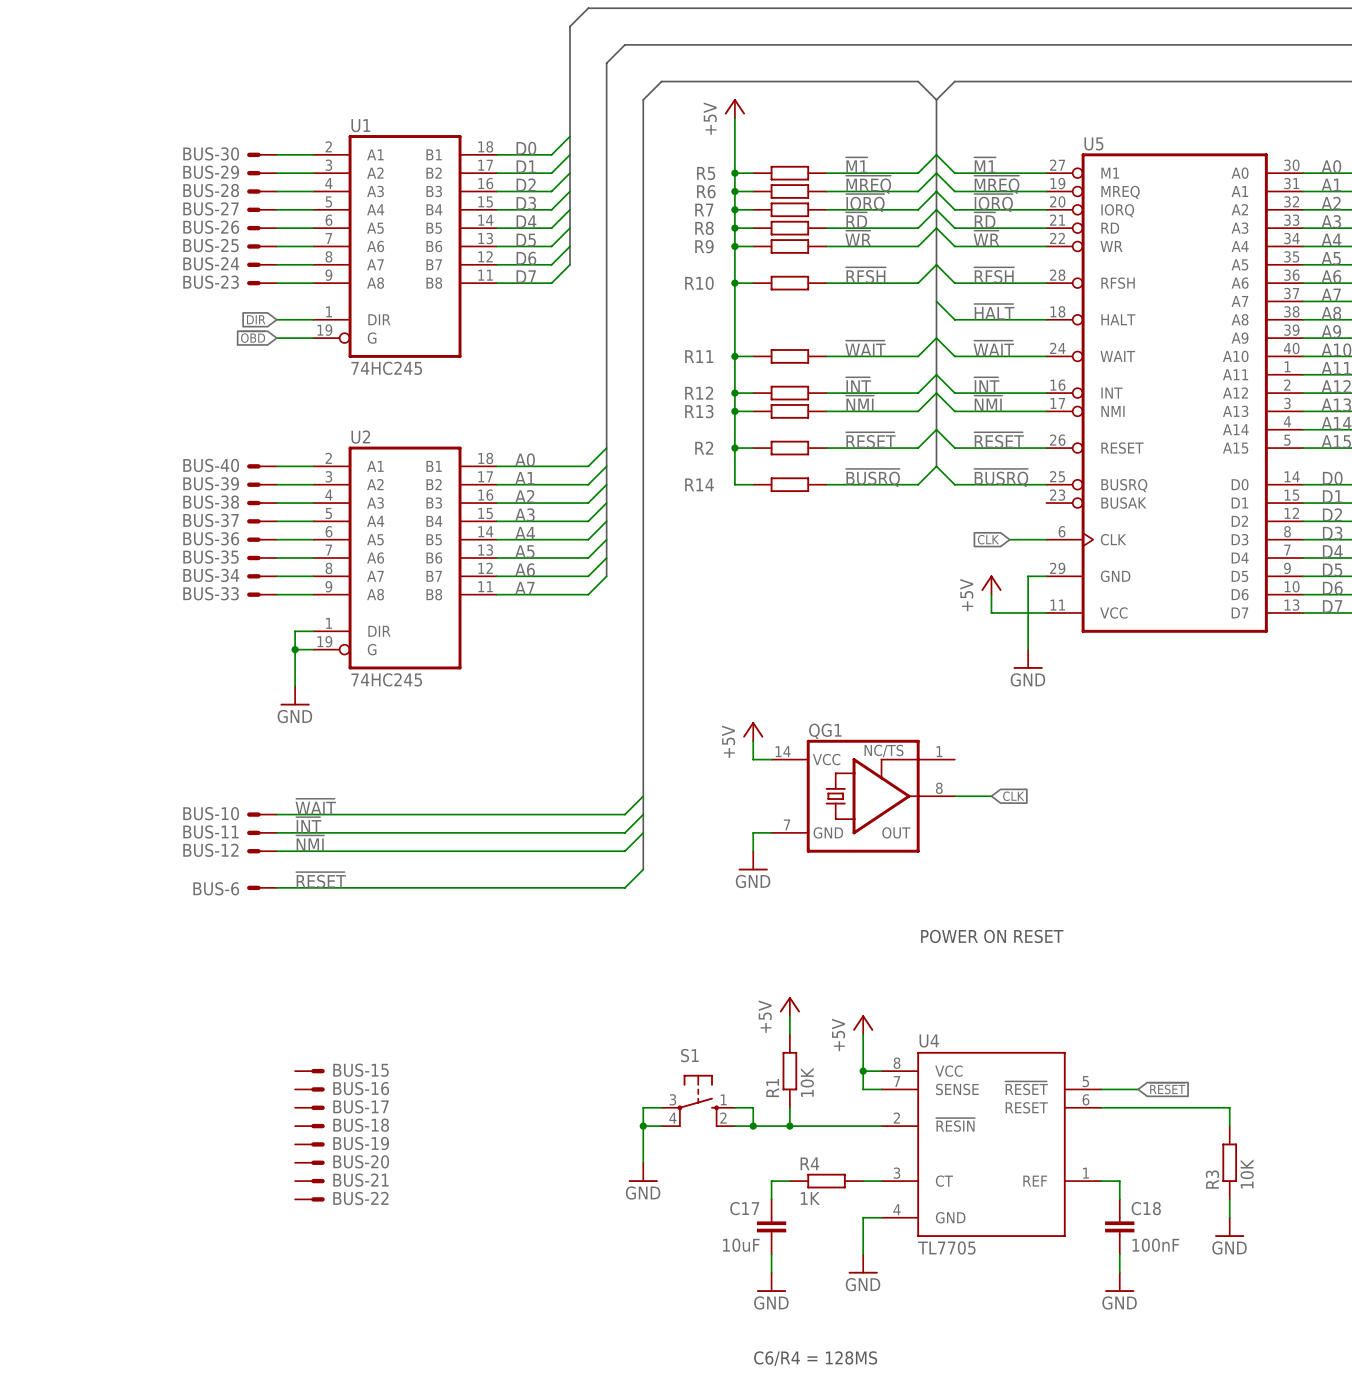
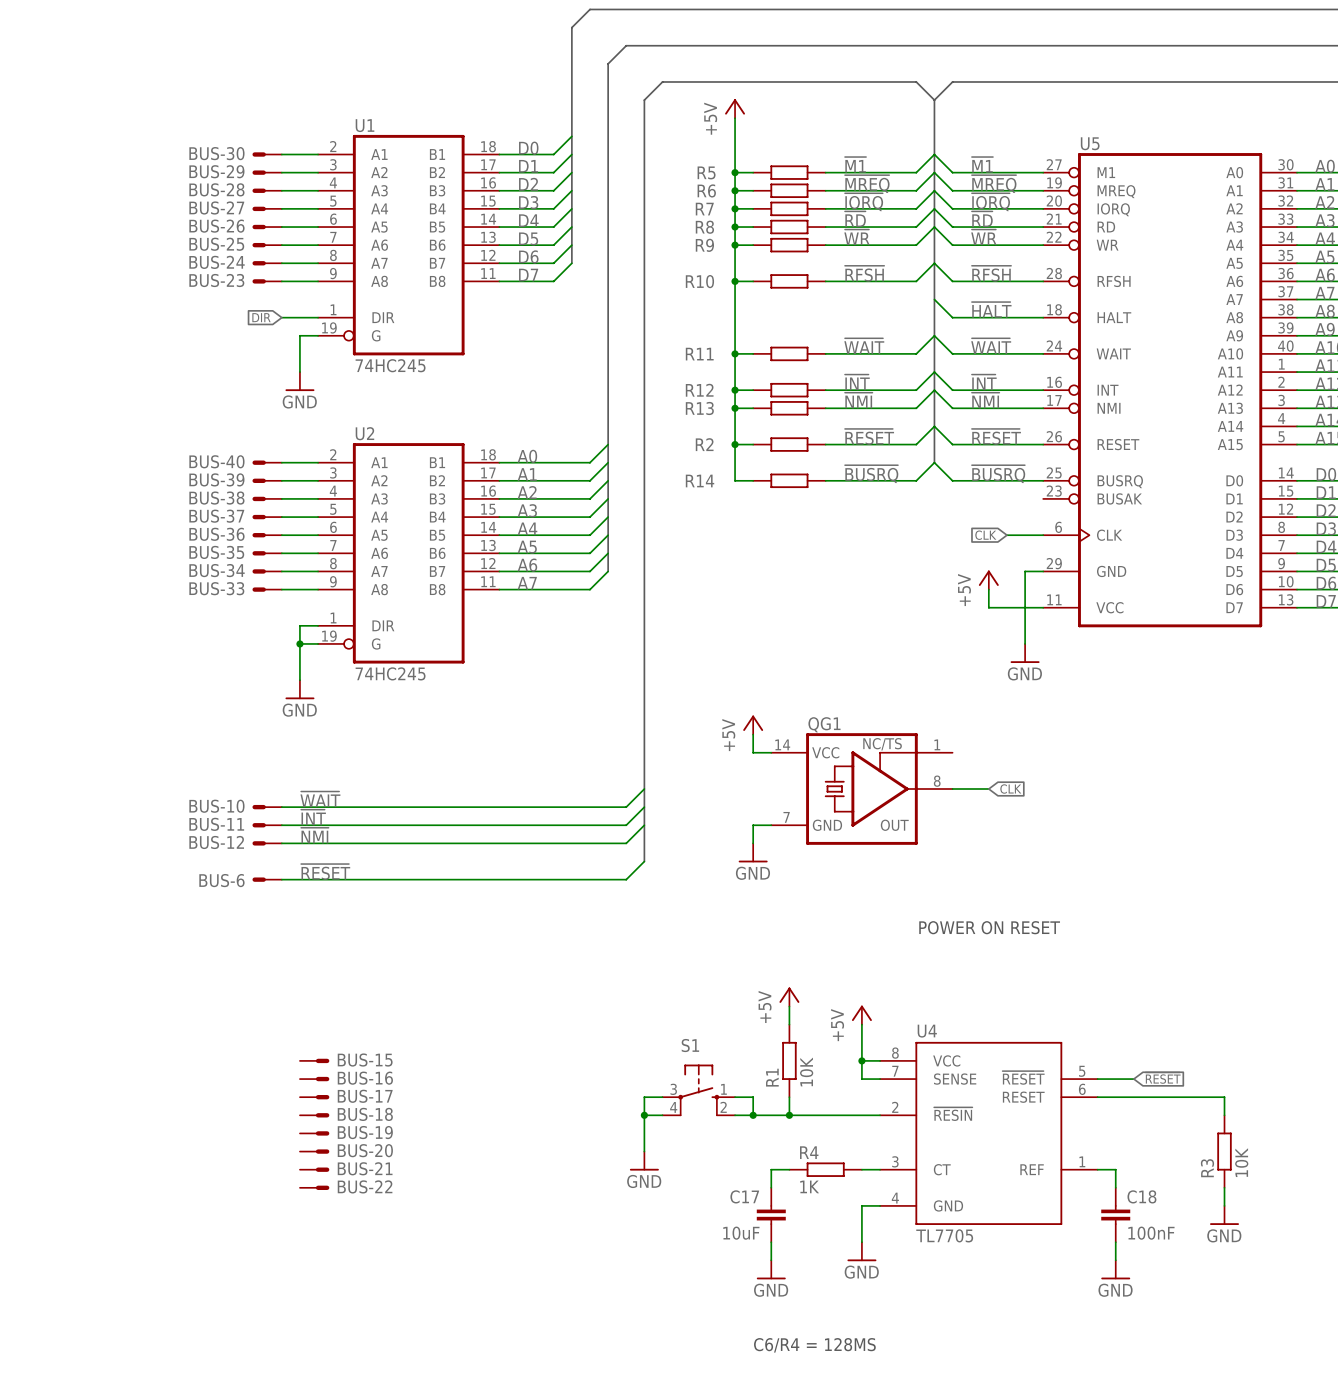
global label: ~{OBD} (253, 337) -> none
wire: (276, 338) (295, 338) -> (299, 372) (299, 335)
power symbol: none -> GND (299, 381)

